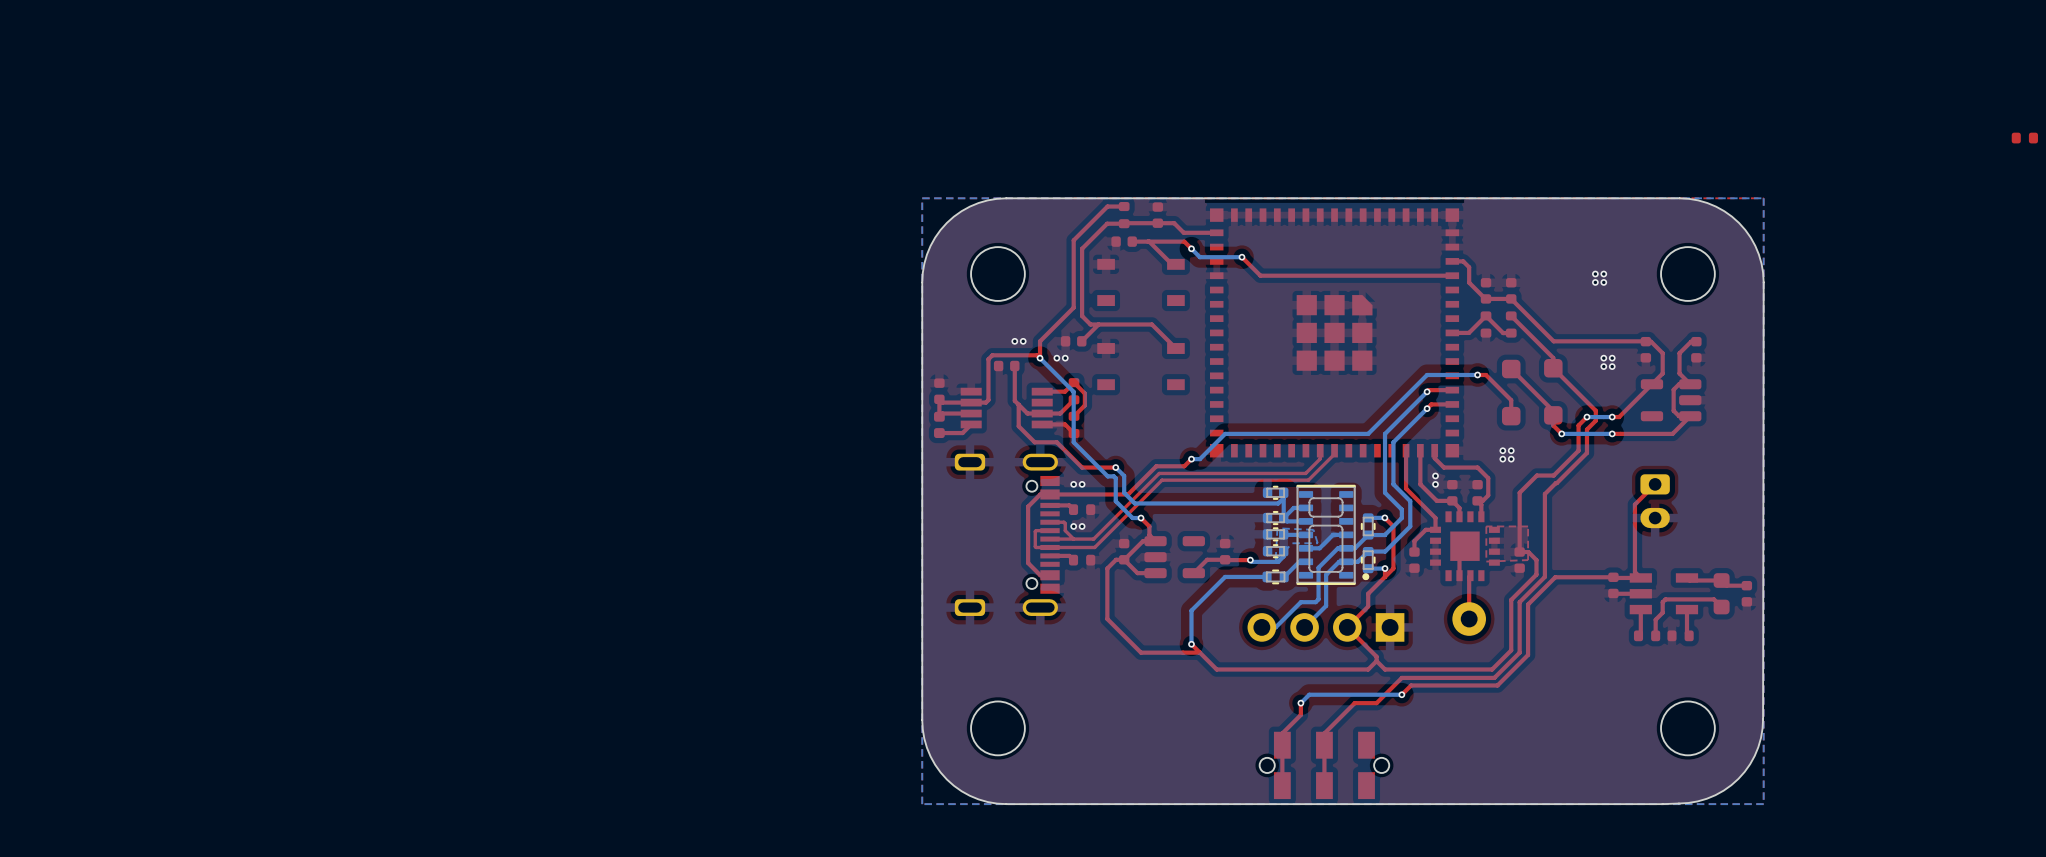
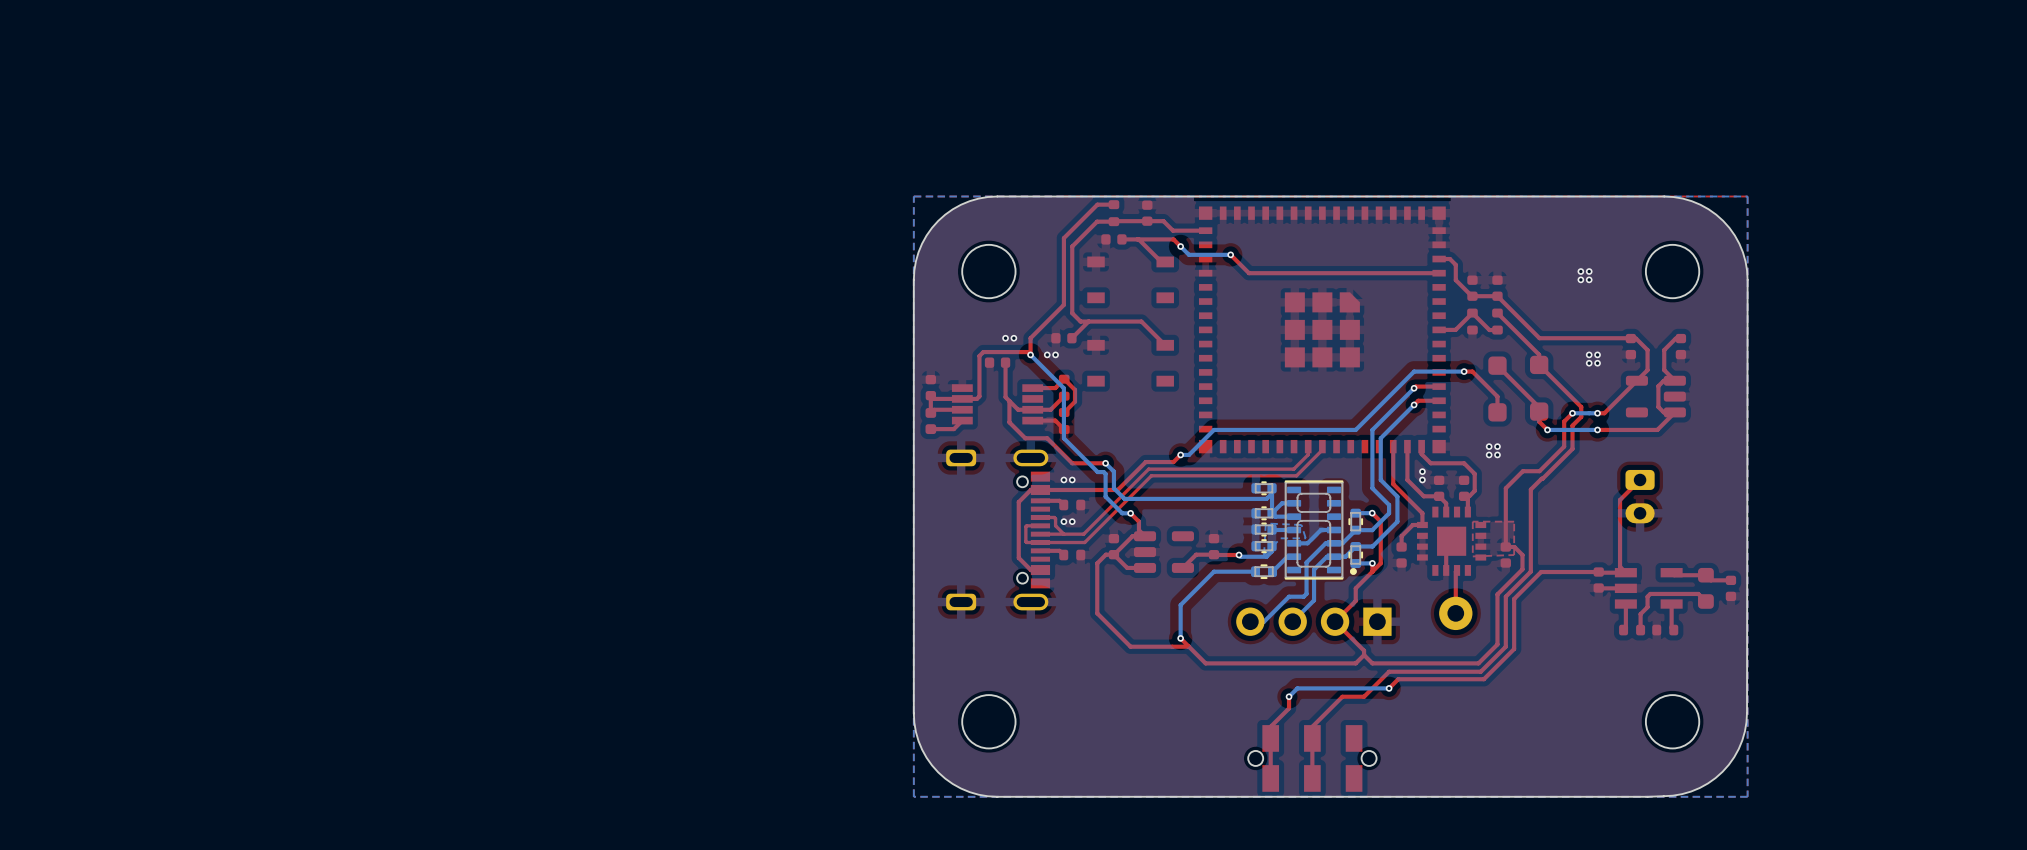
part: (2024, 138) -> none

